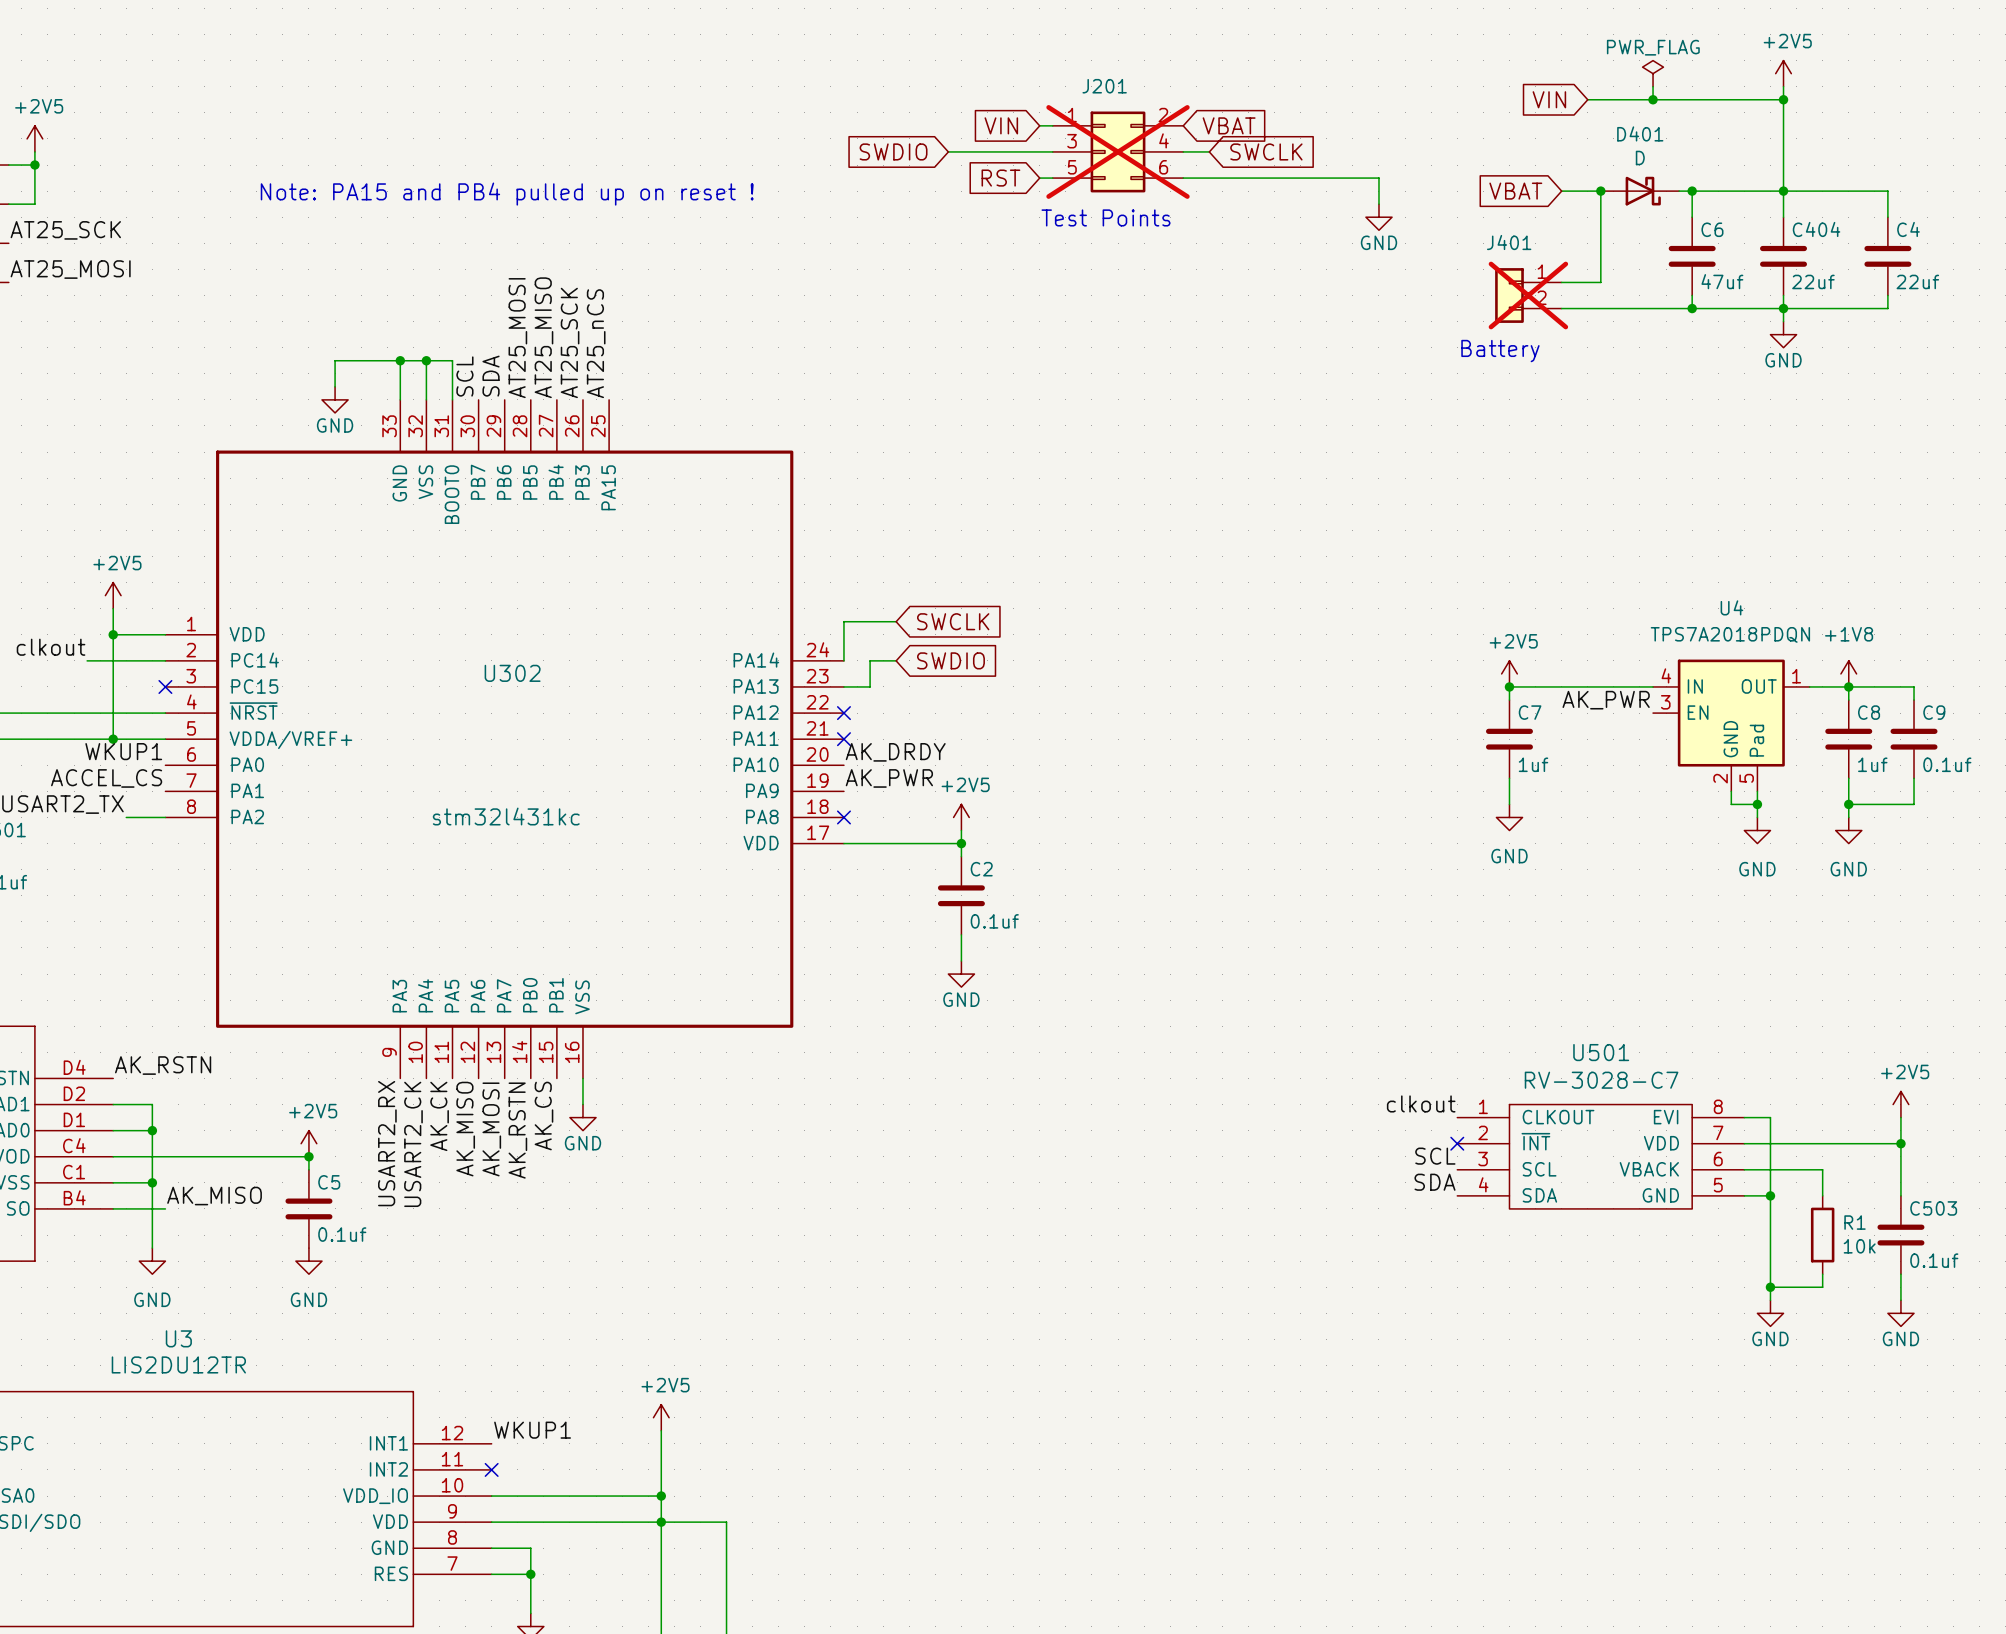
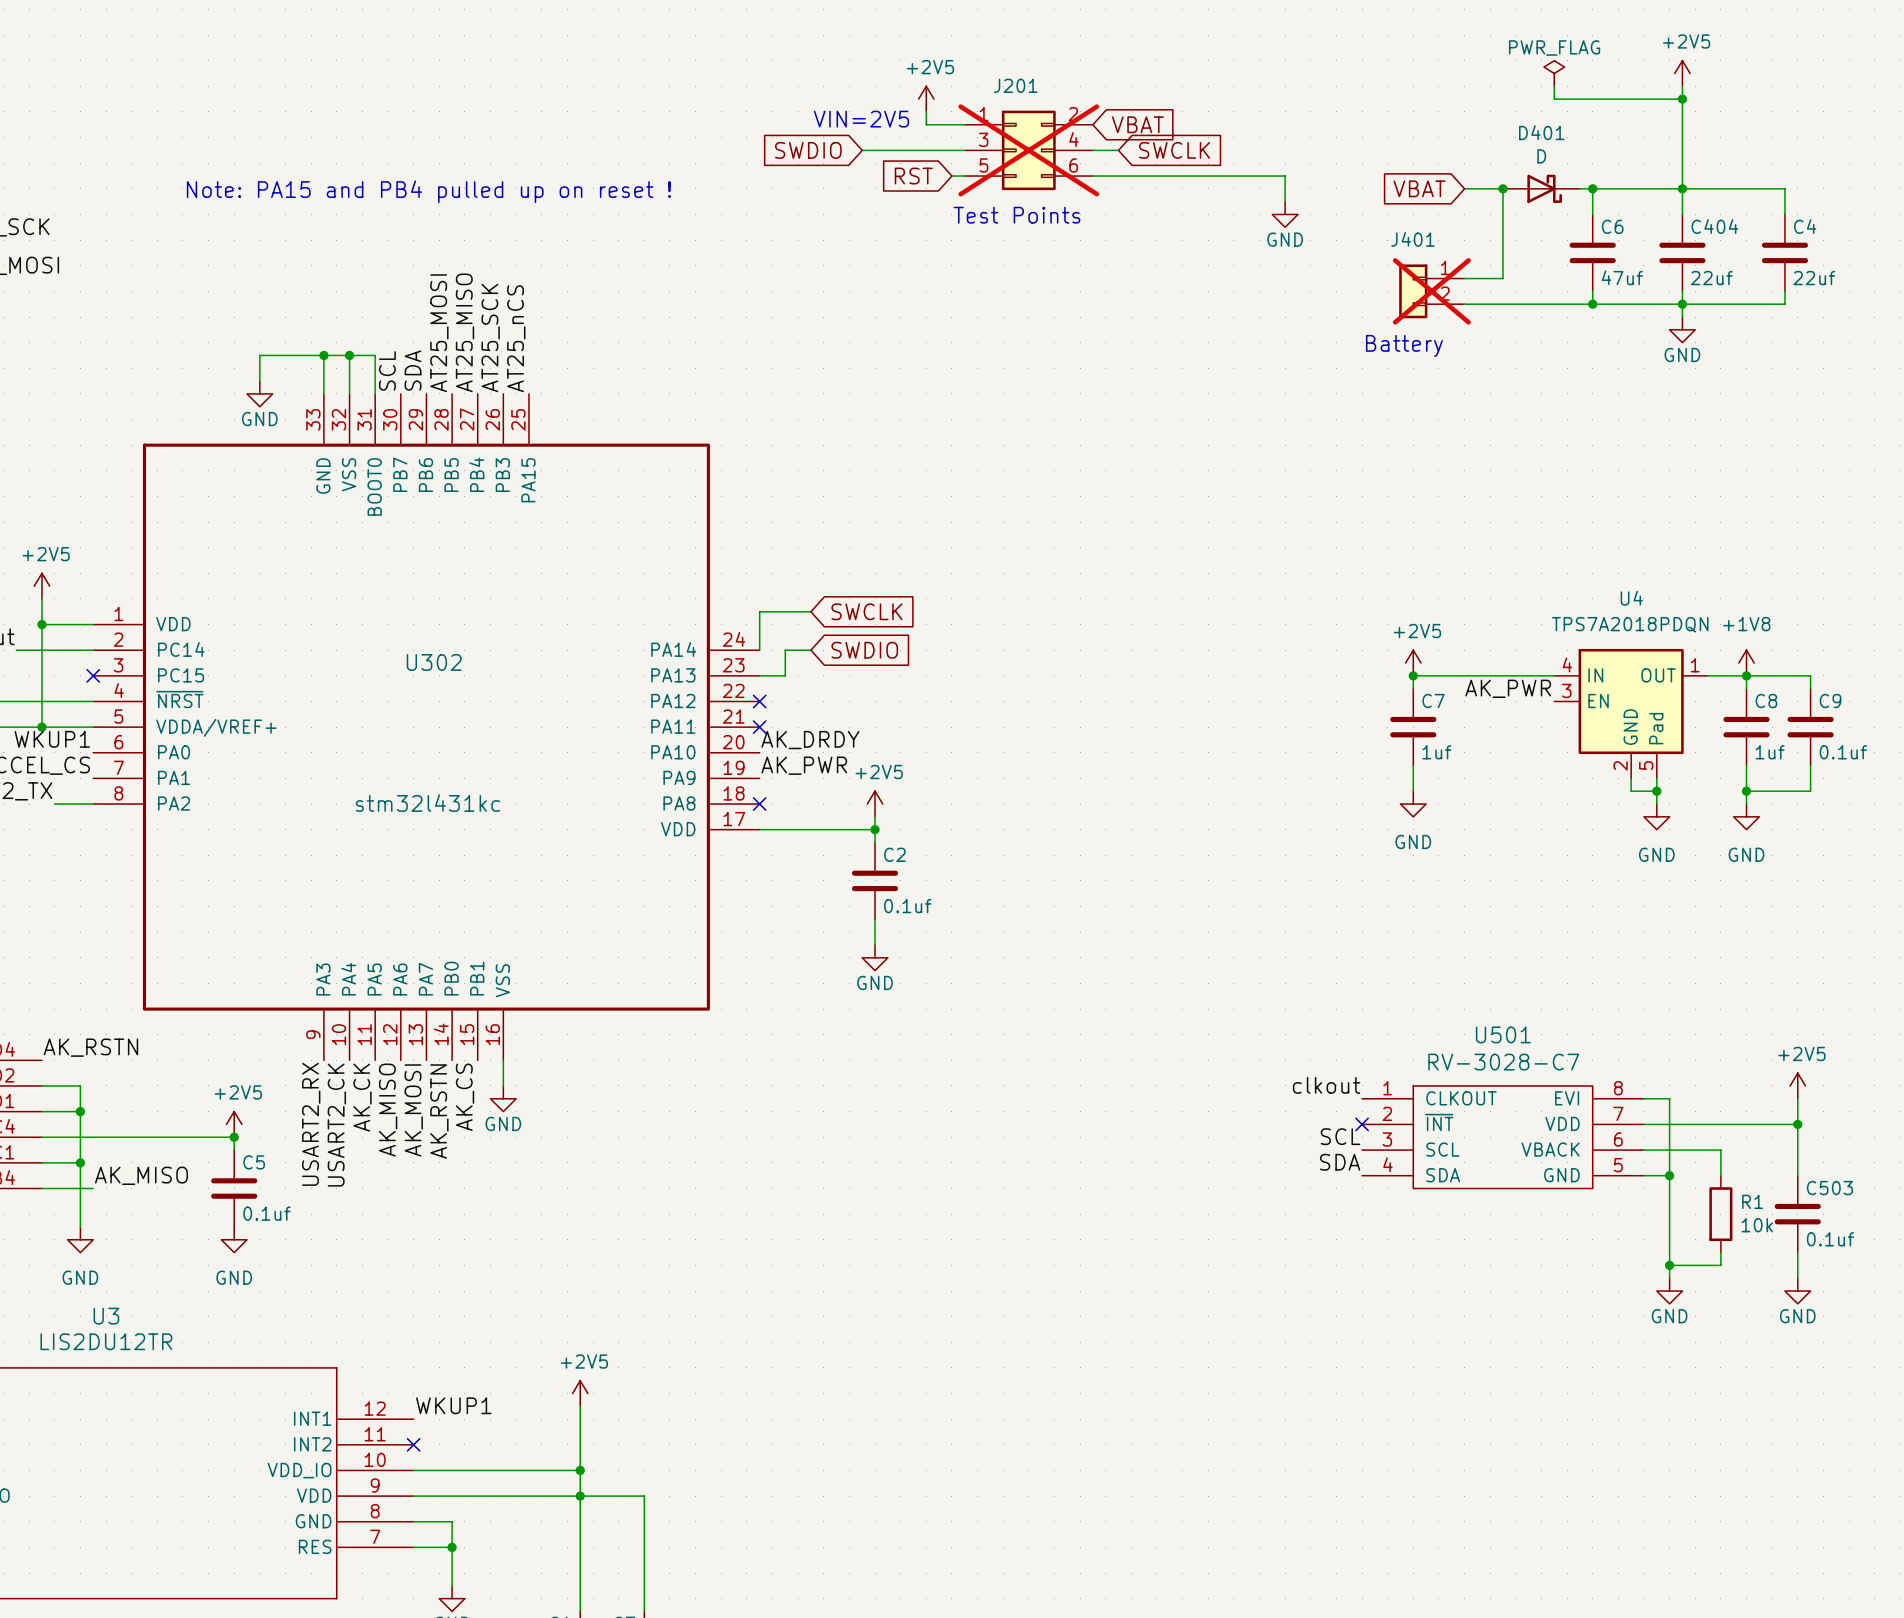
power symbol: none -> +2V5 (926, 99)
global label: VIN (1549, 99) -> none
wire: (1587, 99) (1653, 99) -> none
junction: (1653, 99) -> none
wire: none -> (926, 111) (926, 124) (951, 124)
text: none -> VIN=2V5 (861, 119)
global label: VIN (1001, 125) -> none

